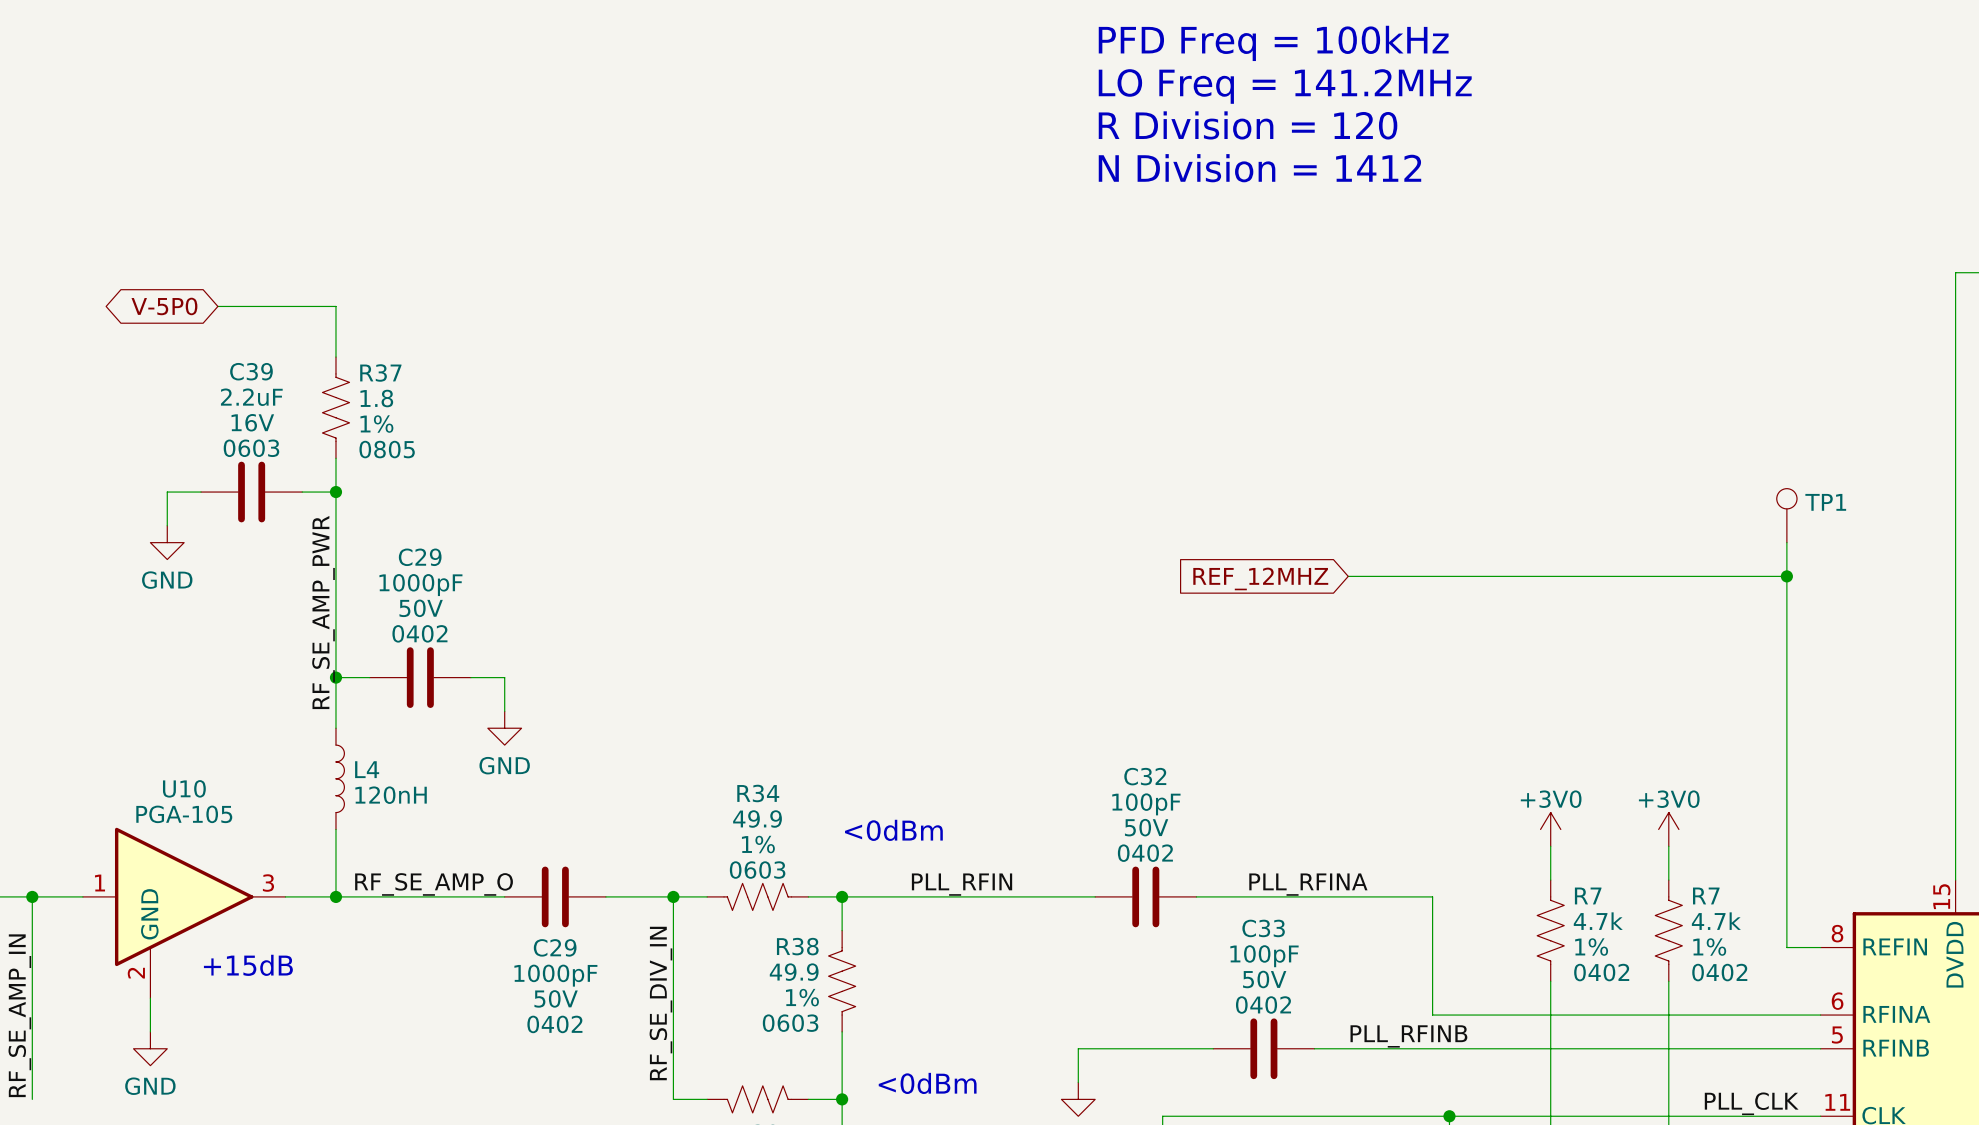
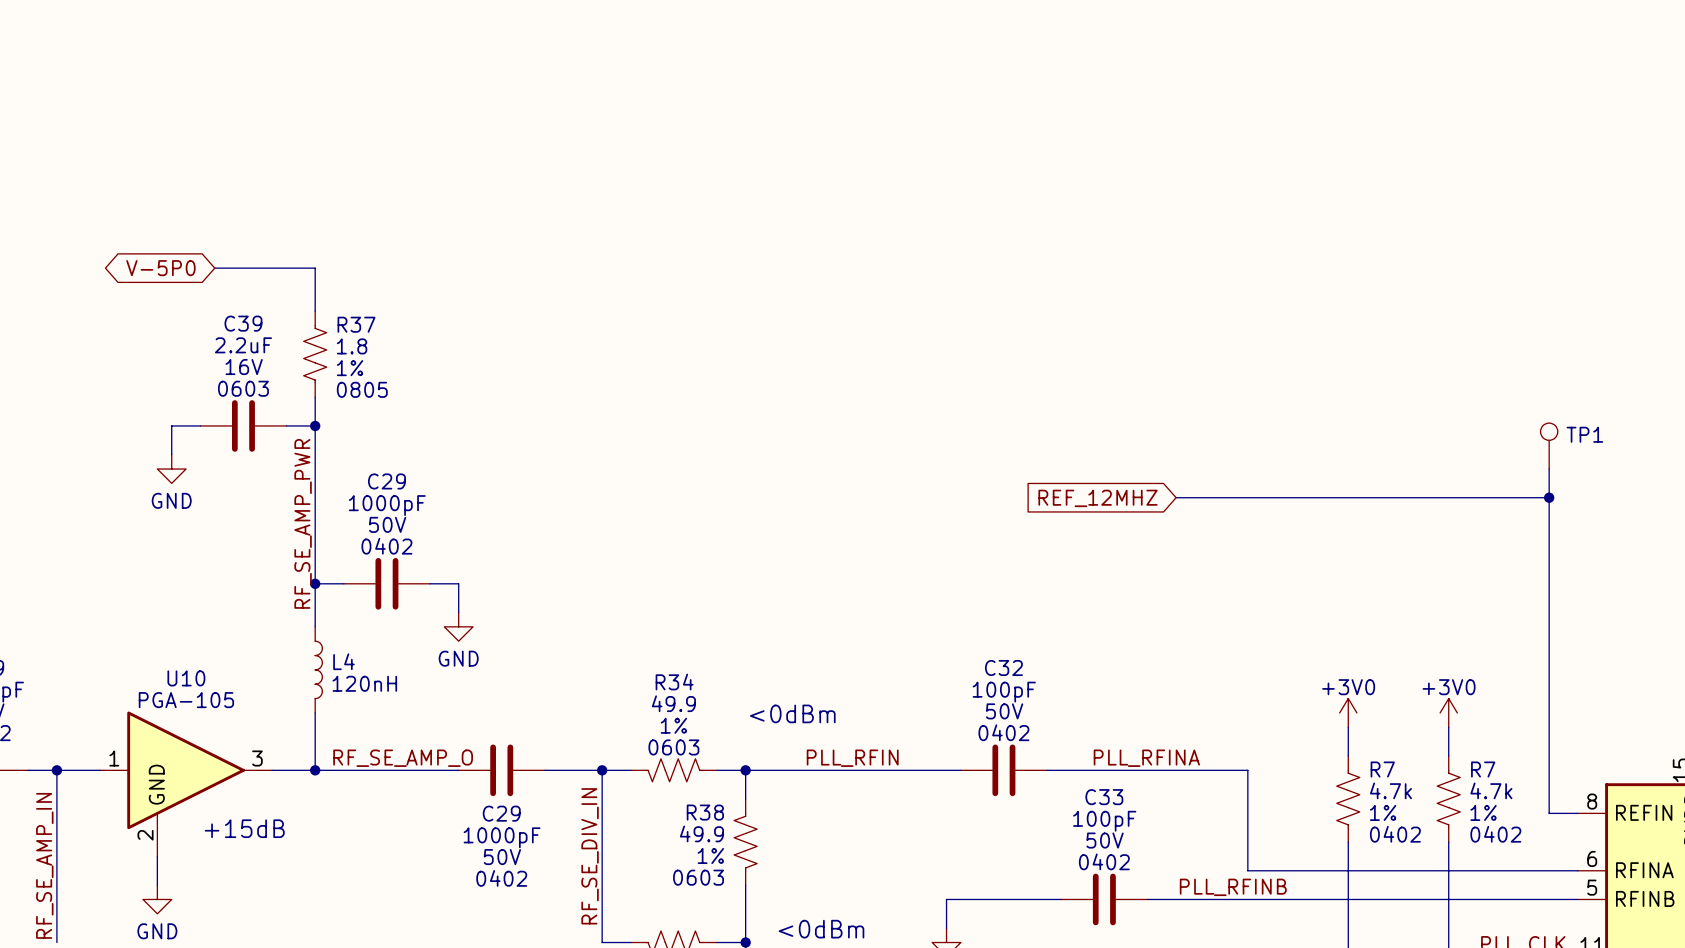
text: PFD Freq = 100kHz (1273, 43) -> none
text: LO Freq = 141.2MHz (1285, 86) -> none
text: R Division = 120 (1248, 125) -> none
text: N Division = 1412 (1259, 168) -> none

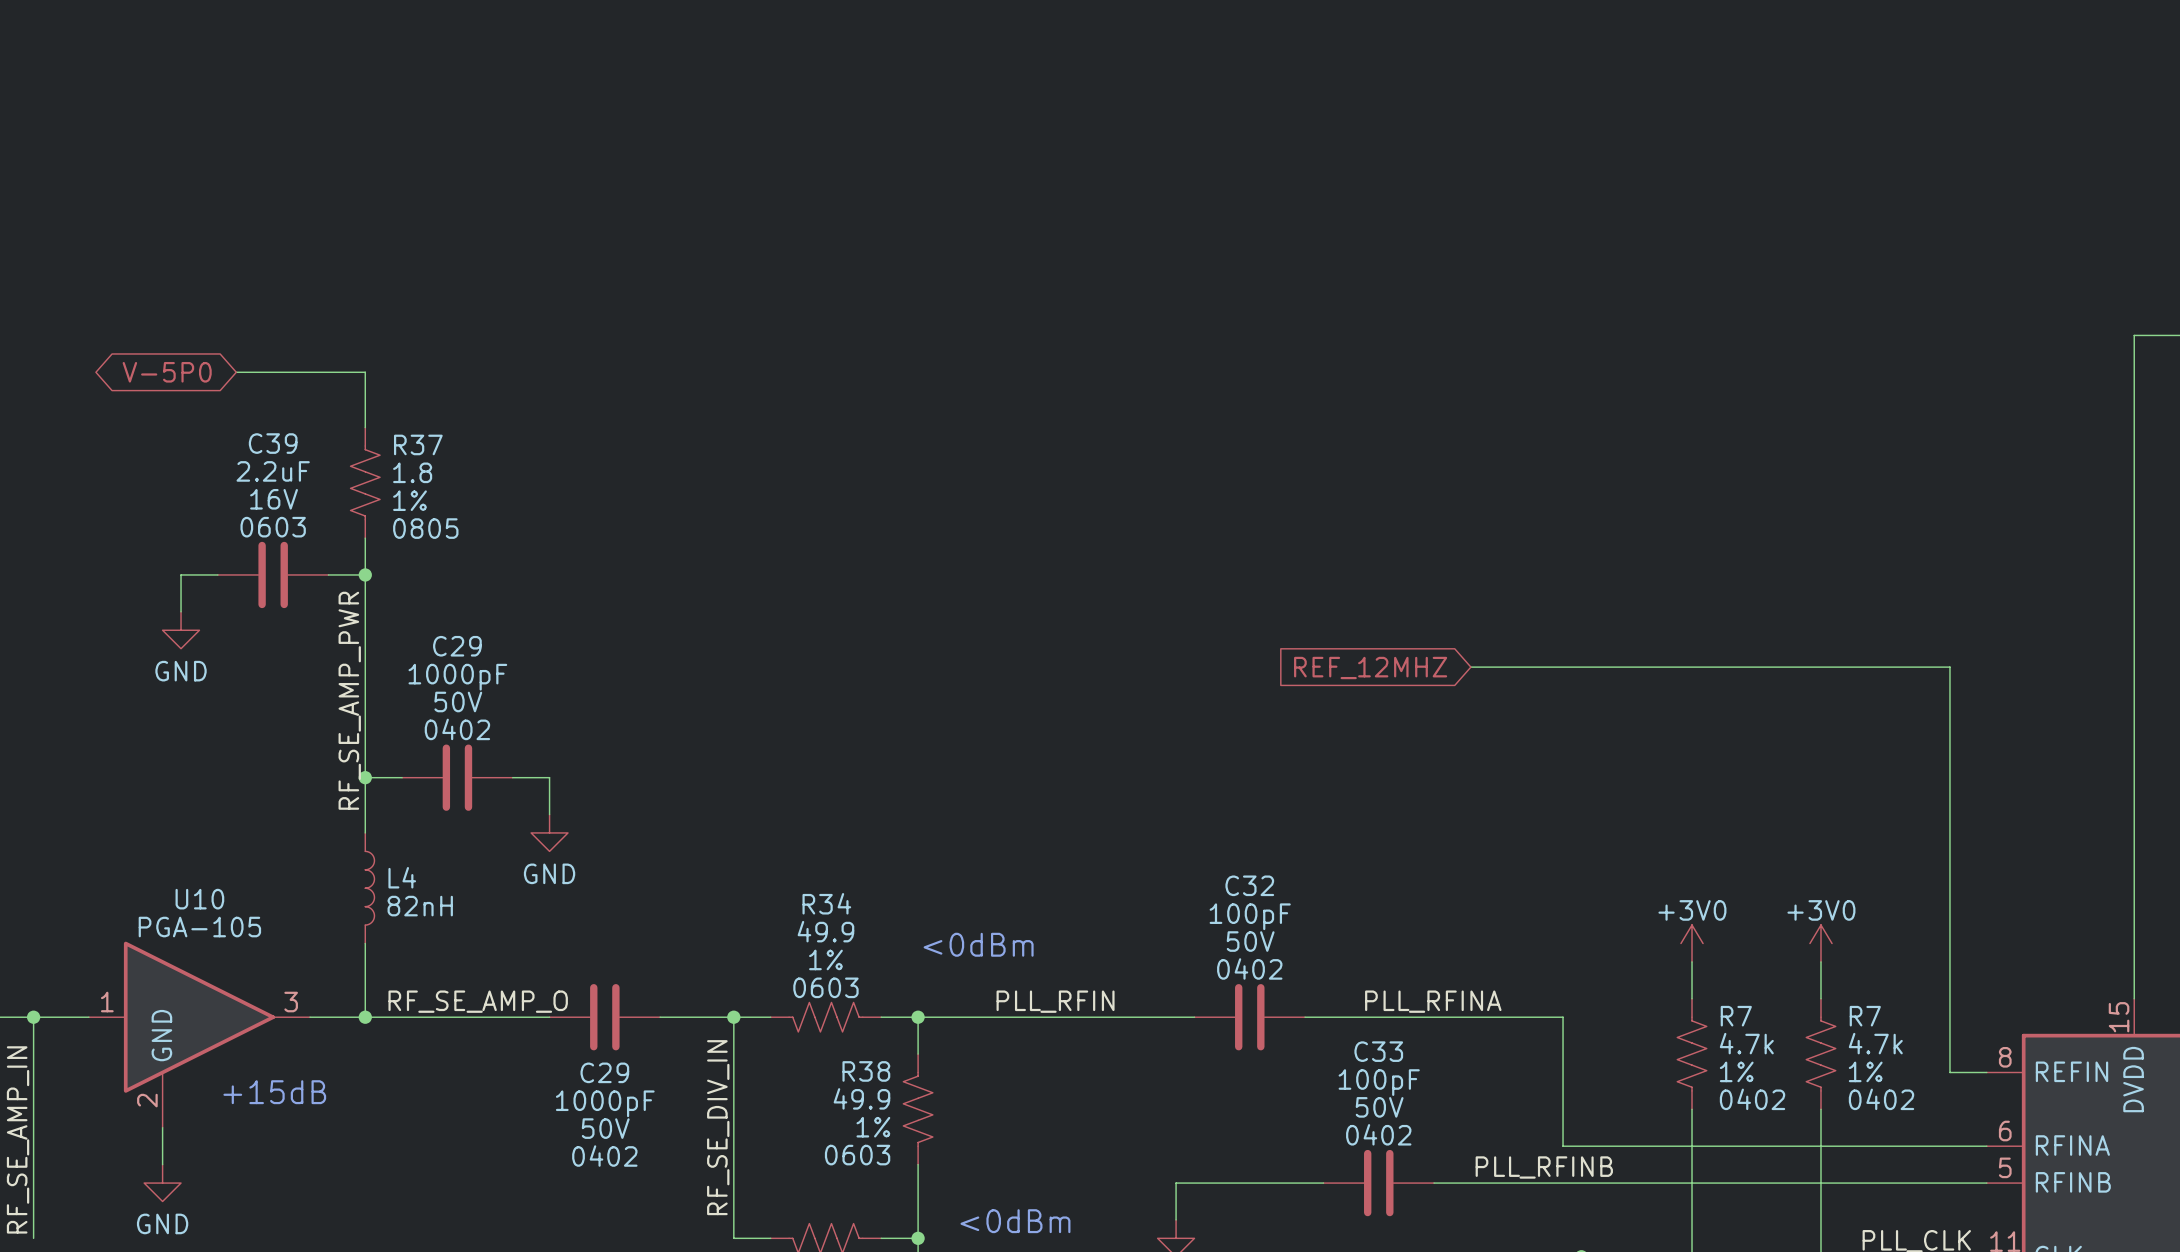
TP1: (1549, 446) -> none
wire: (1549, 469) (1549, 497) -> none
junction: (1549, 497) -> none
L4 value: 120nH (364, 683) -> 82nH (420, 906)

